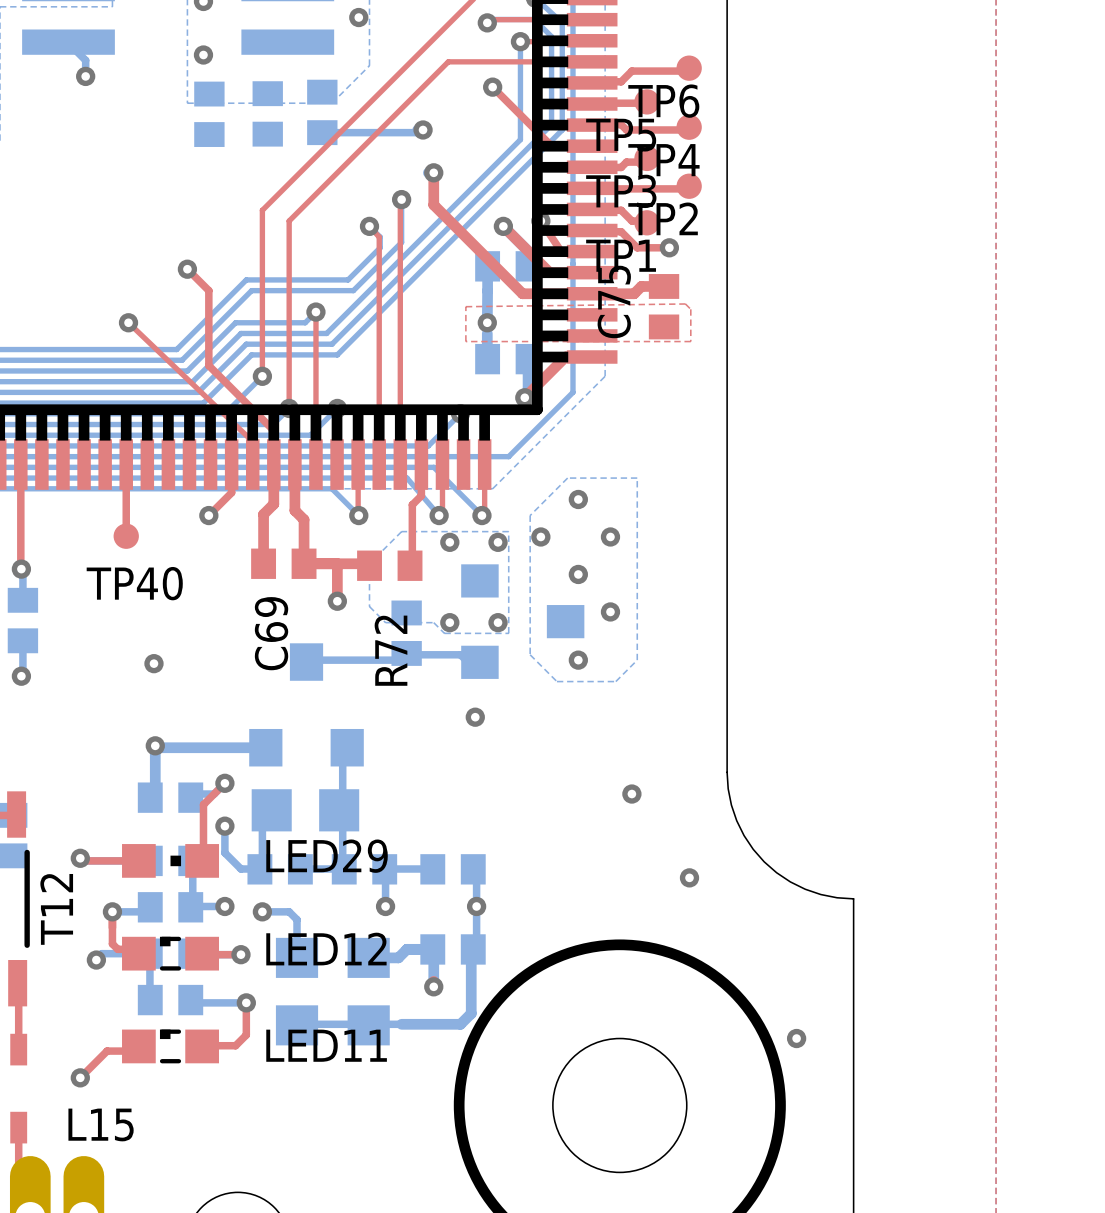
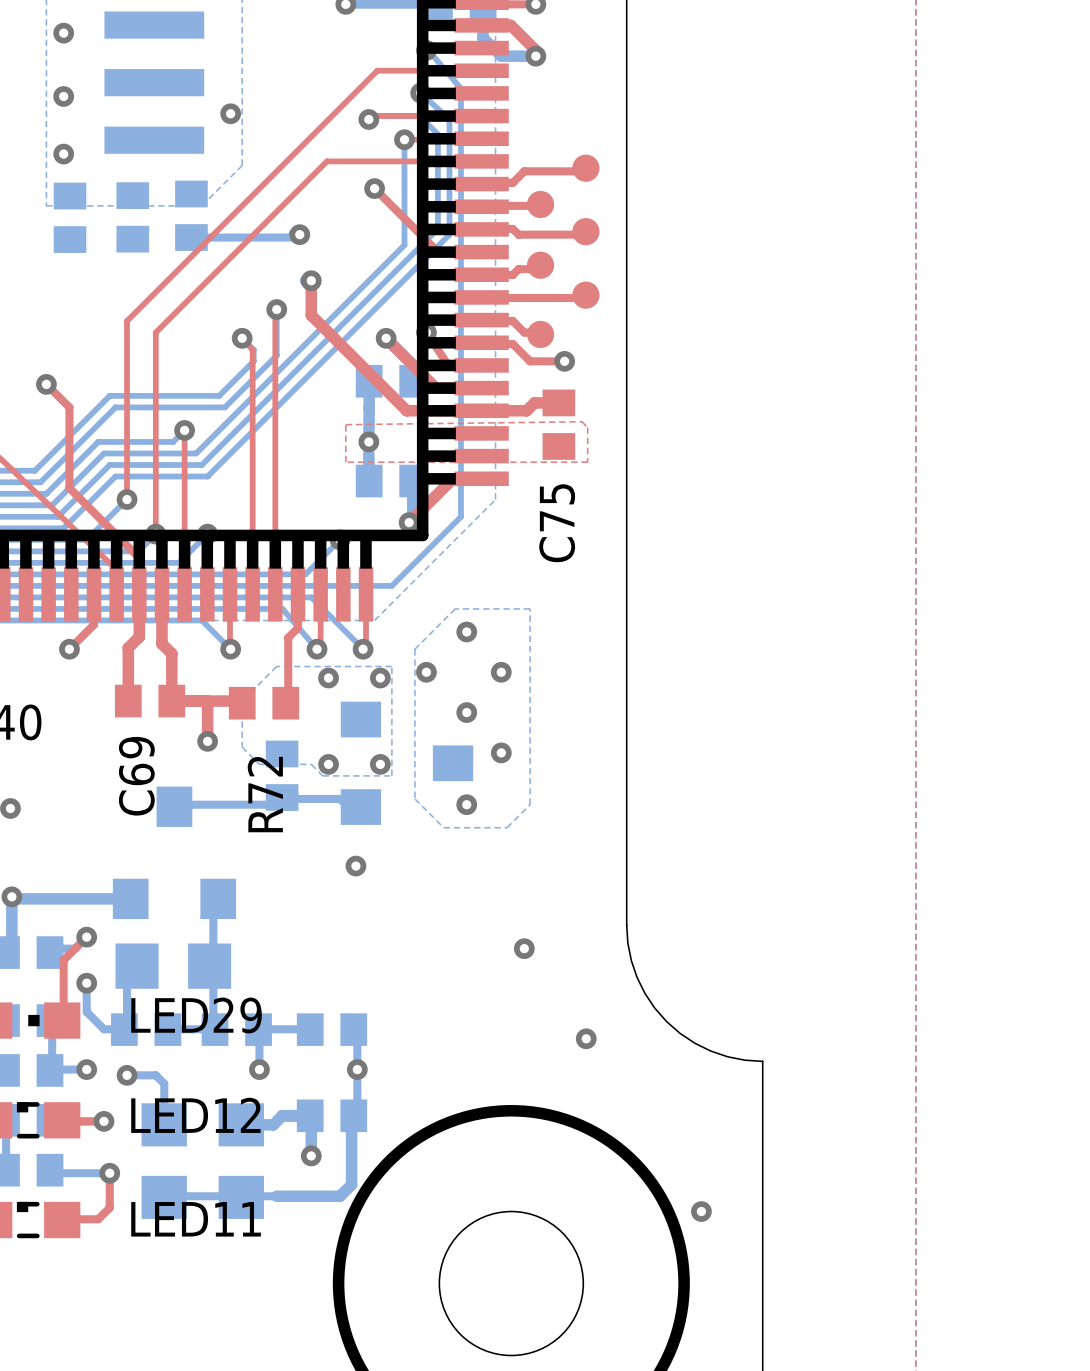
TP6 name: TP6 (663, 101) -> none
TP5 name: TP5 (621, 135) -> none
TP4 name: TP4 (663, 160) -> none
TP3 name: TP3 (621, 191) -> none
TP2 name: TP2 (663, 218) -> none
TP1 name: TP1 (621, 255) -> none
C75 name position: C75 (614, 301) -> C75 (557, 523)

